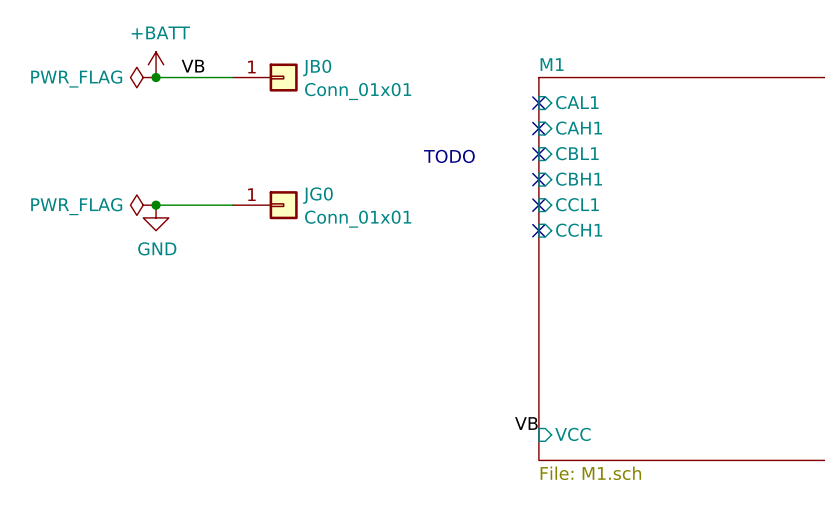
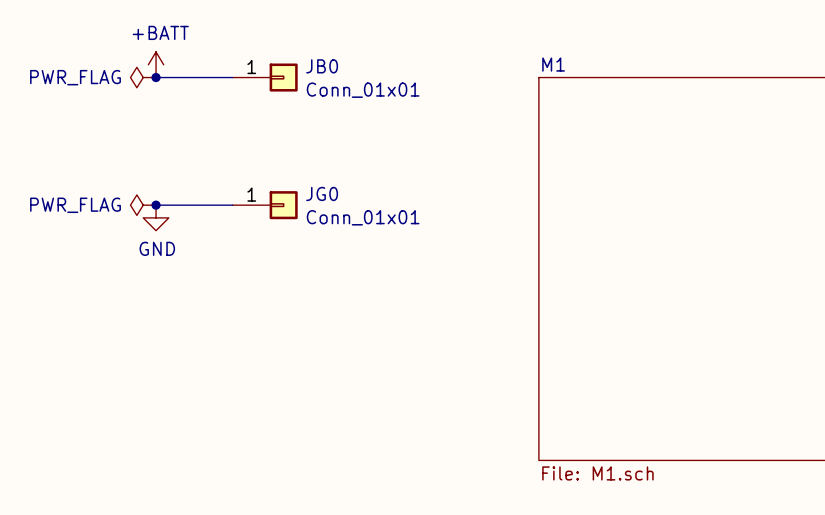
label: VB (192, 66) -> none
sheet pin: CAL1 (577, 102) -> none
no-connect mark: (538, 103) -> none
no-connect mark: (538, 128) -> none
sheet pin: CAH1 (579, 128) -> none
sheet pin: CBL1 (577, 153) -> none
no-connect mark: (538, 154) -> none
text: TODO (449, 156) -> none
no-connect mark: (538, 179) -> none
sheet pin: CBH1 (579, 179) -> none
sheet pin: CCL1 (577, 204) -> none
no-connect mark: (538, 205) -> none
no-connect mark: (538, 230) -> none
sheet pin: CCH1 (579, 230) -> none
label: VB (526, 423) -> none
sheet pin: VCC (572, 434) -> none

